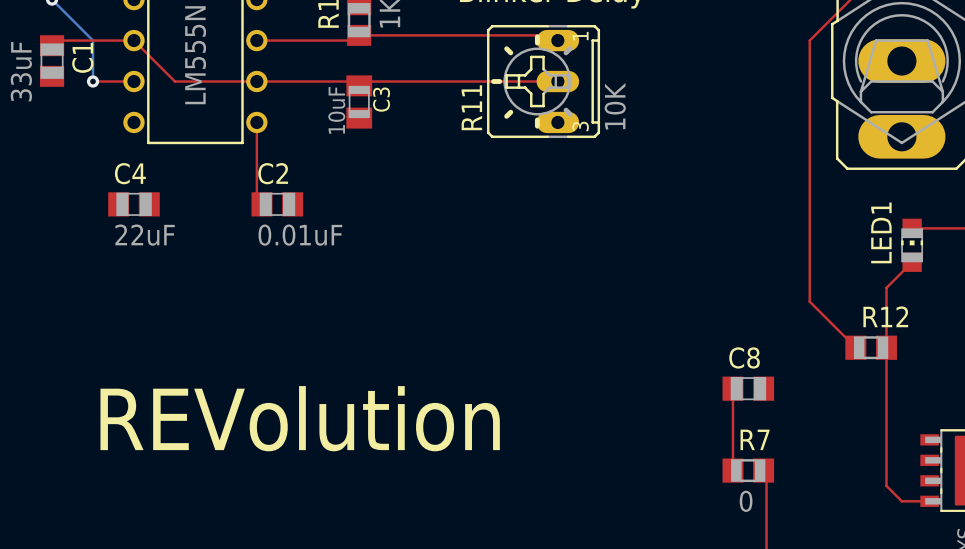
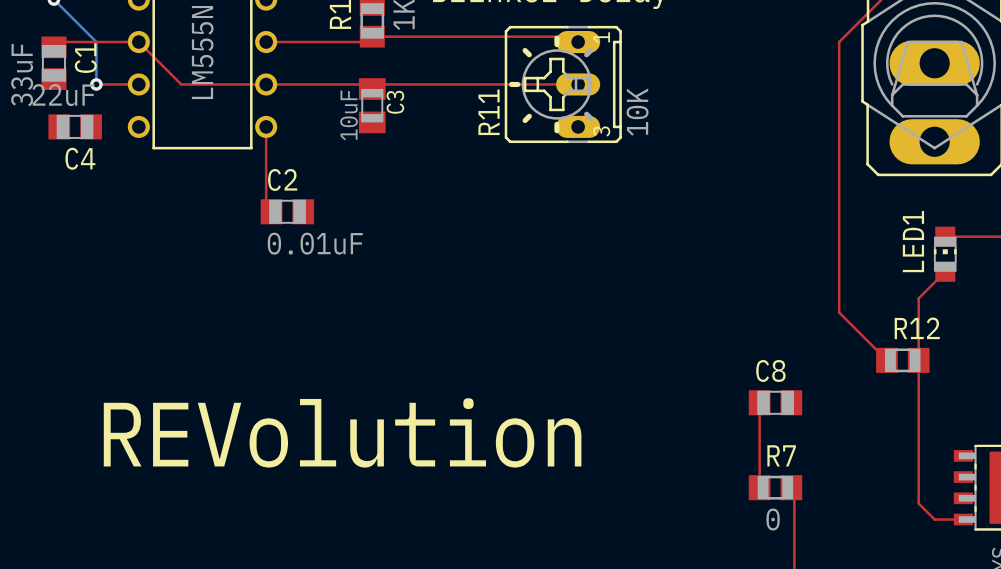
C4 name position: C4 (130, 173) -> C4 (80, 158)
C4 position: (133, 204) -> (75, 126)
C4 value position: 22uF (145, 235) -> 22uF (63, 95)

